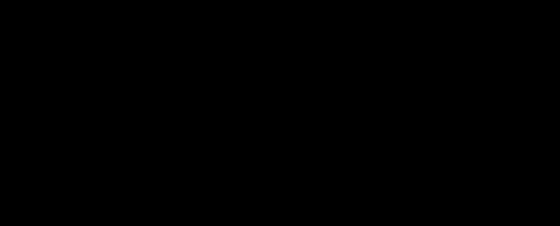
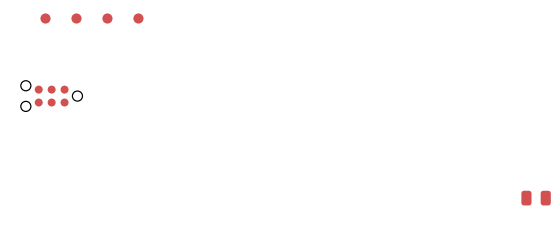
part: none -> (45, 18)
part: none -> (76, 18)
part: none -> (107, 18)
part: none -> (138, 18)
part: none -> (51, 96)
part: none -> (536, 198)

